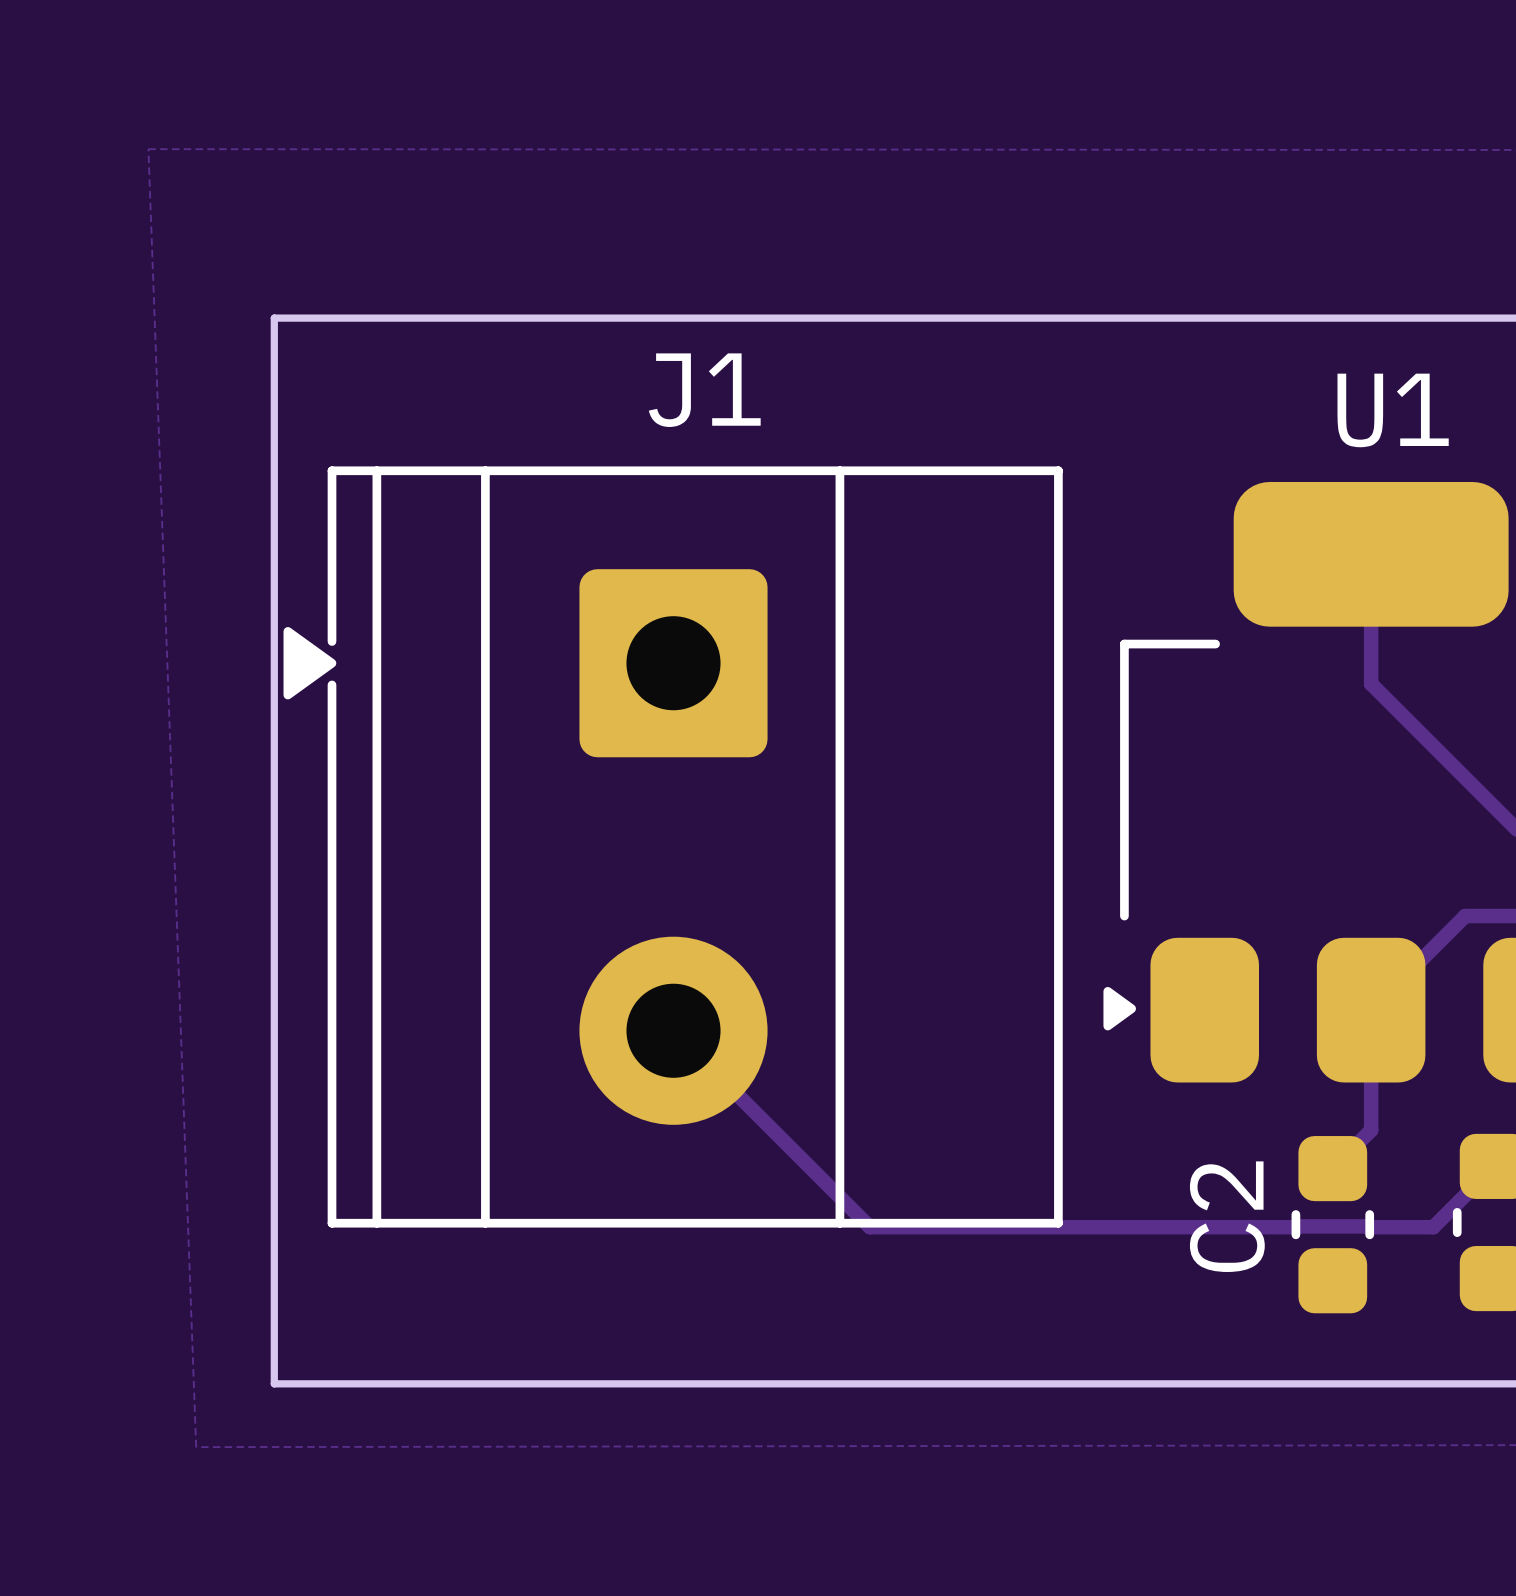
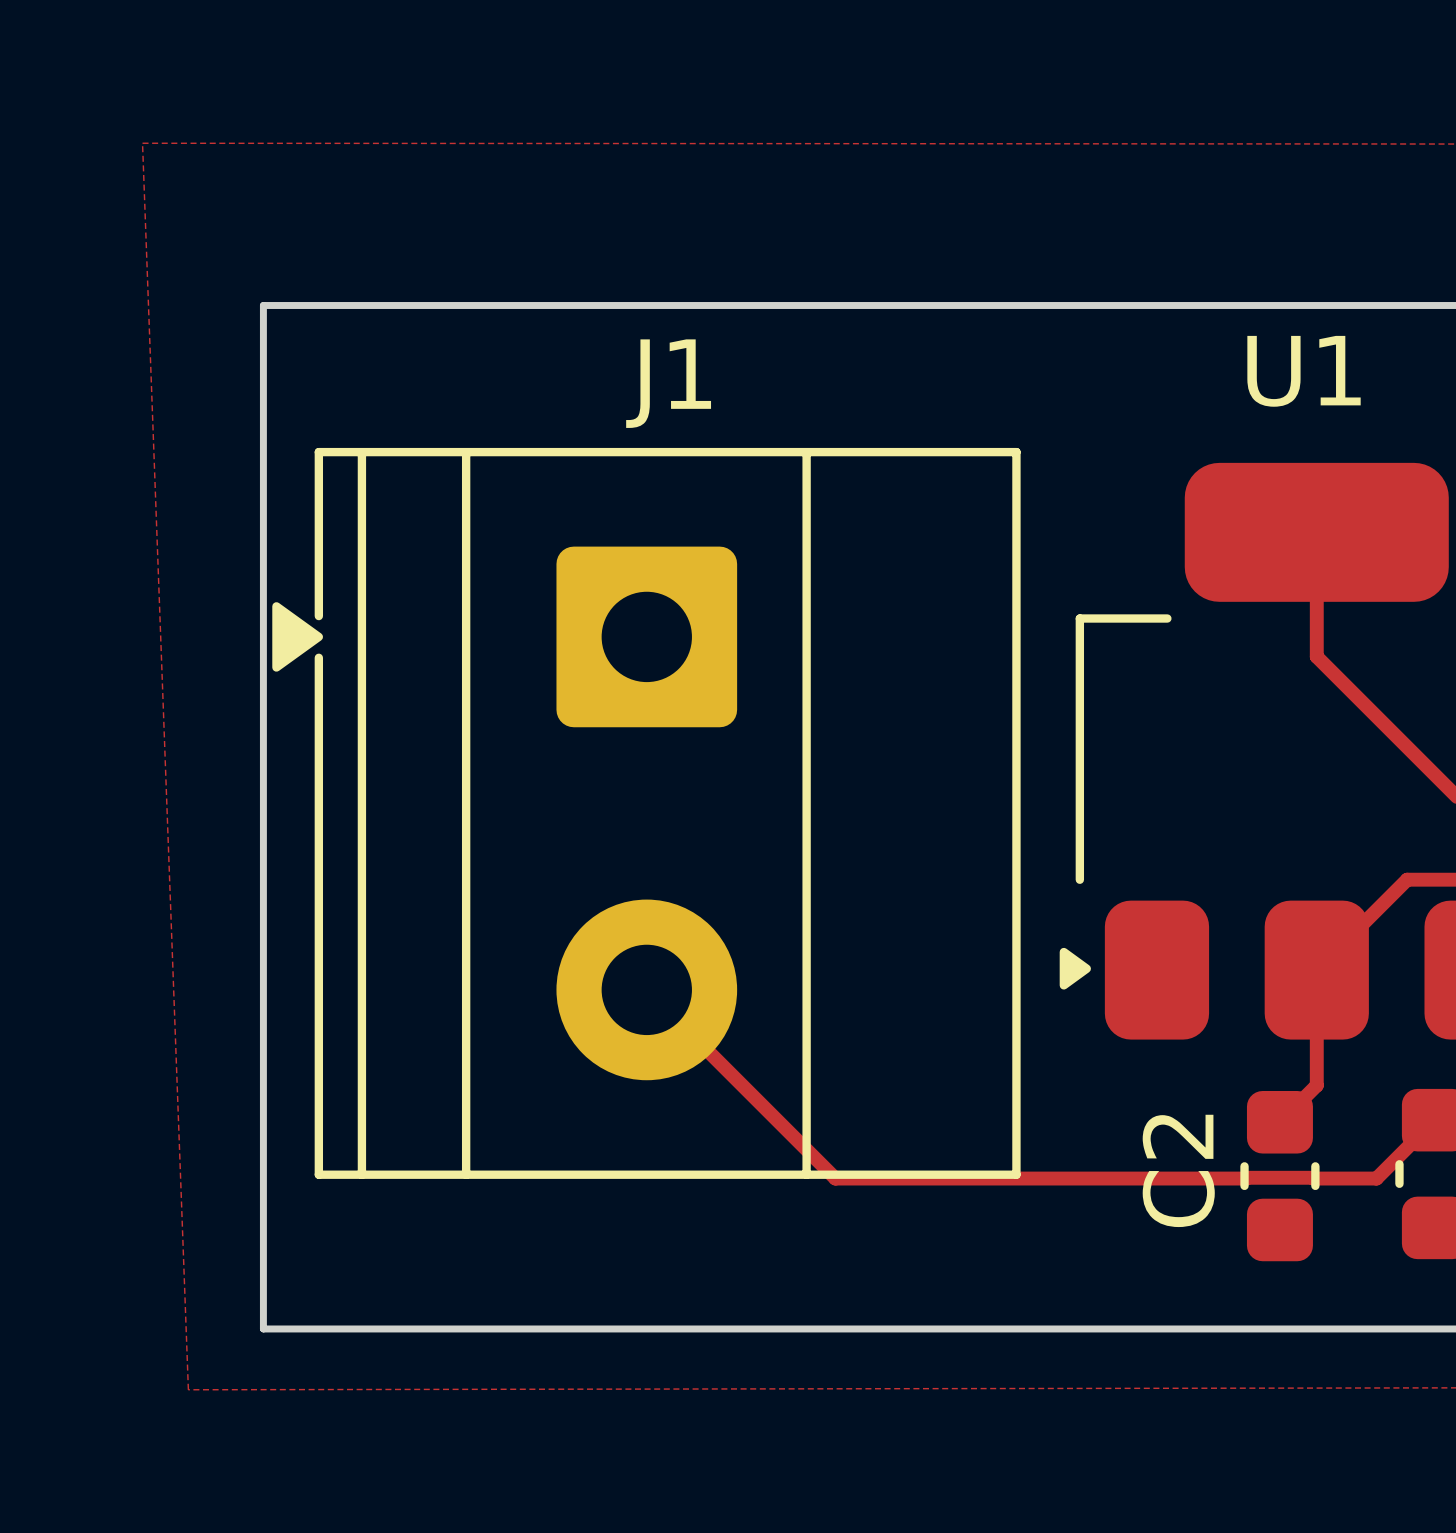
U1 name position: U1 (1393, 410) -> U1 (1304, 371)

